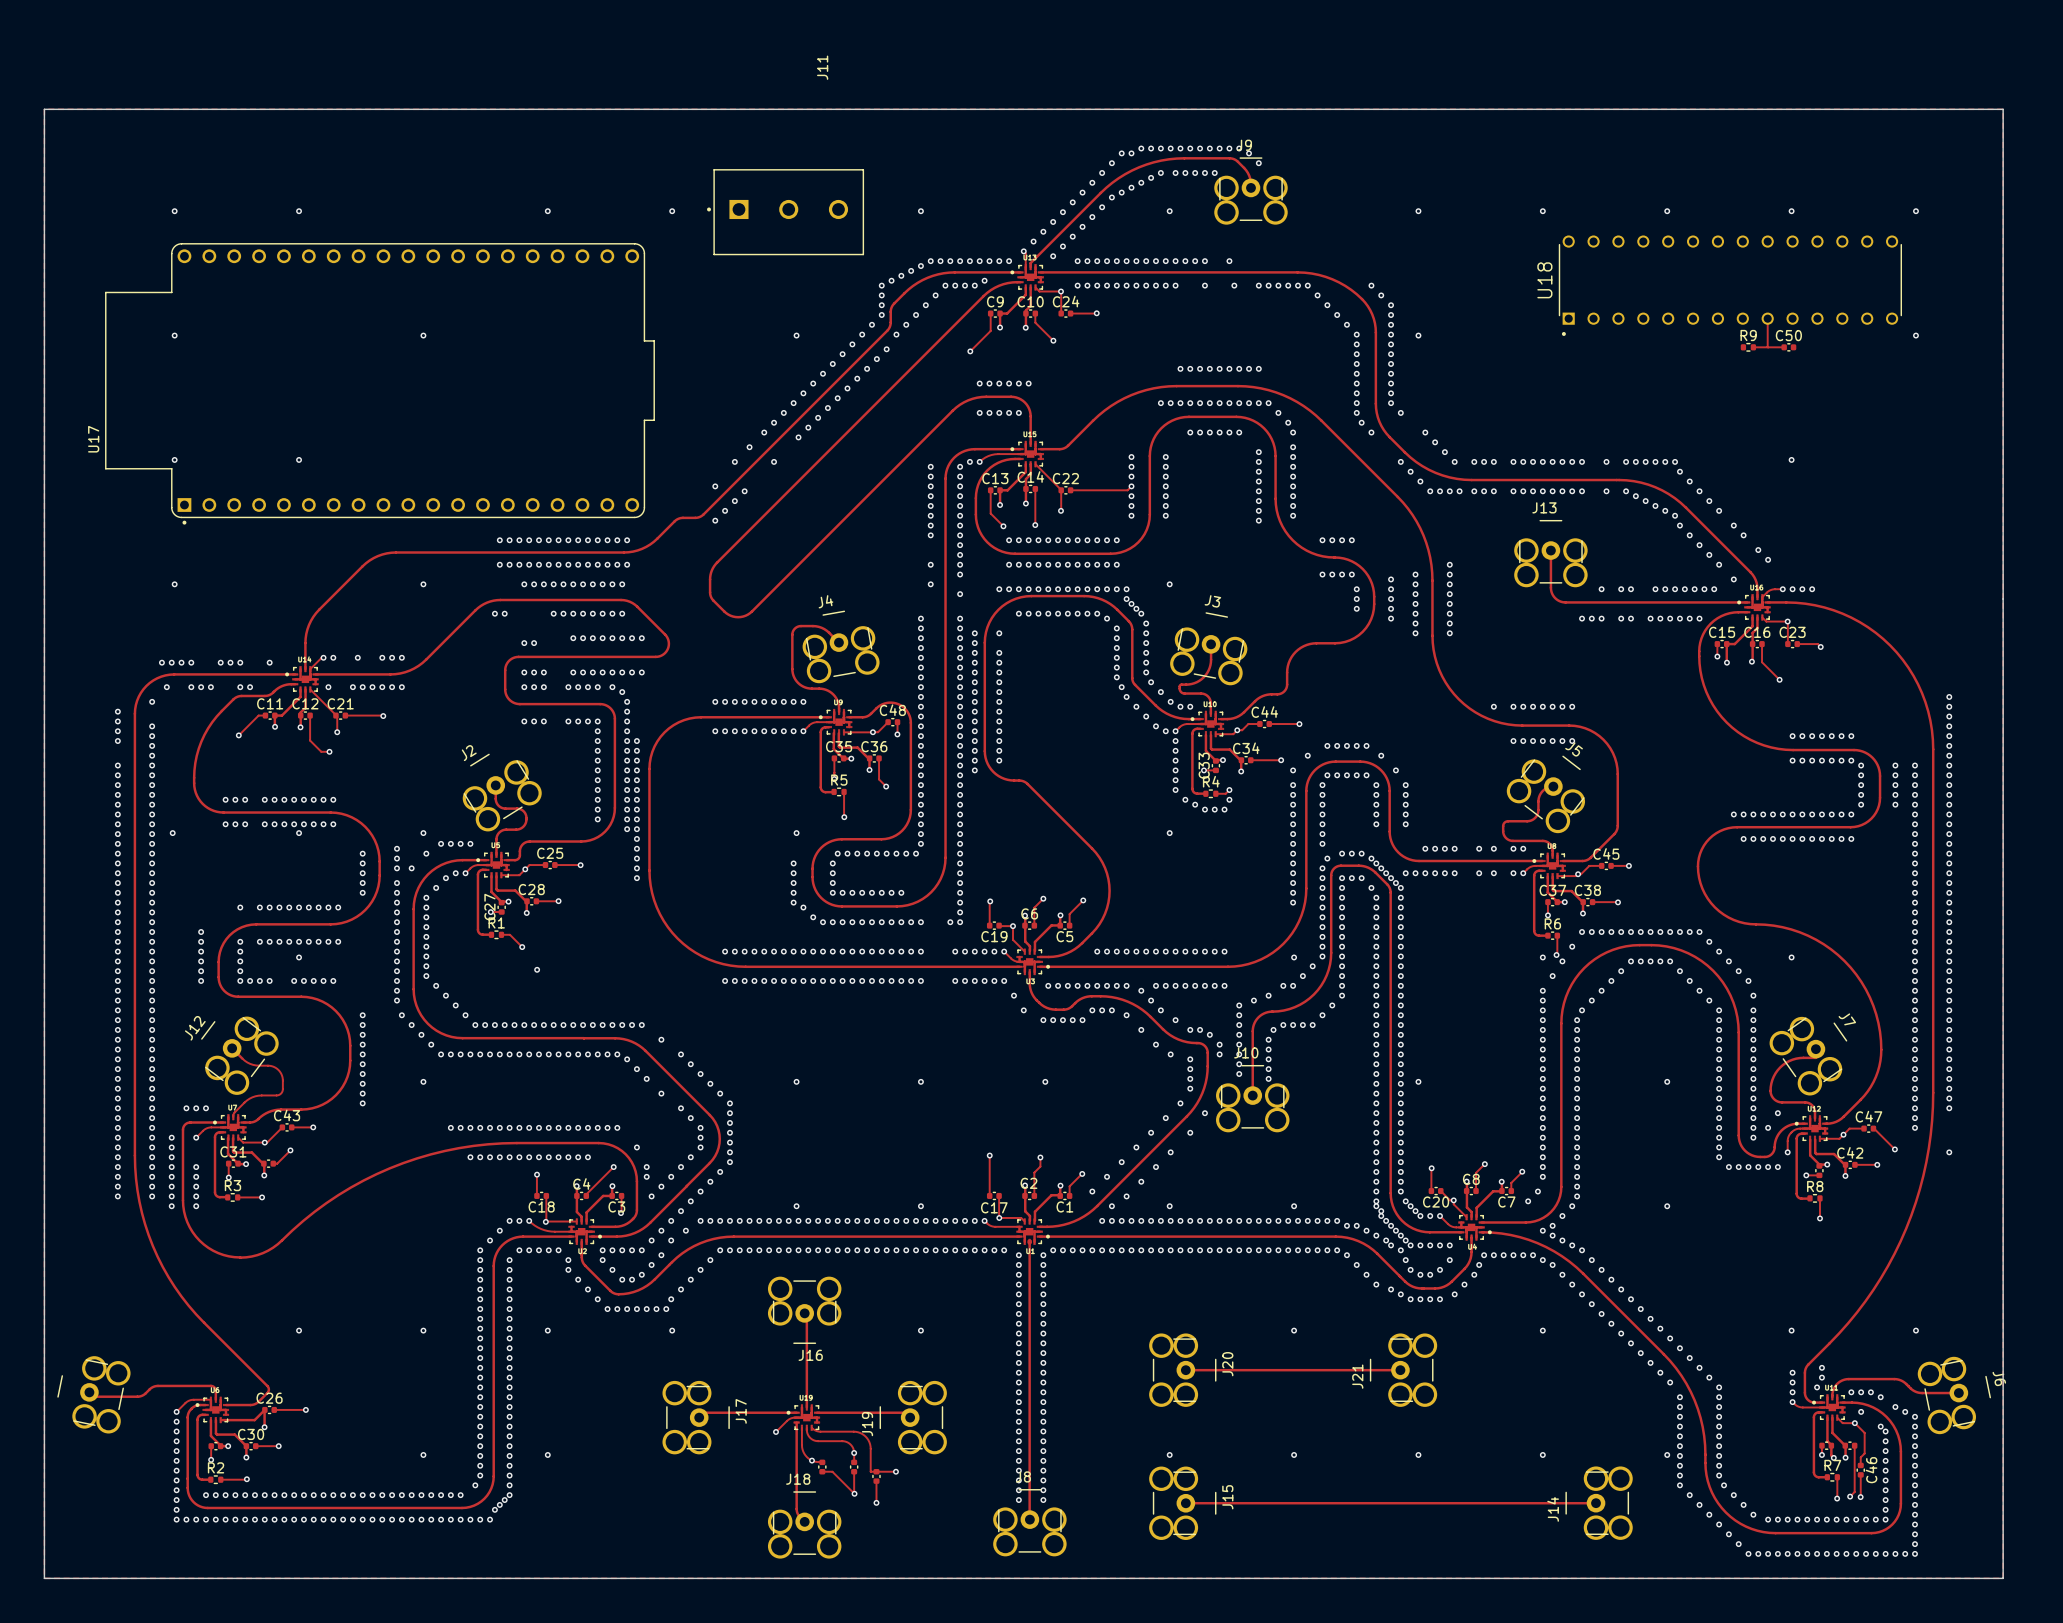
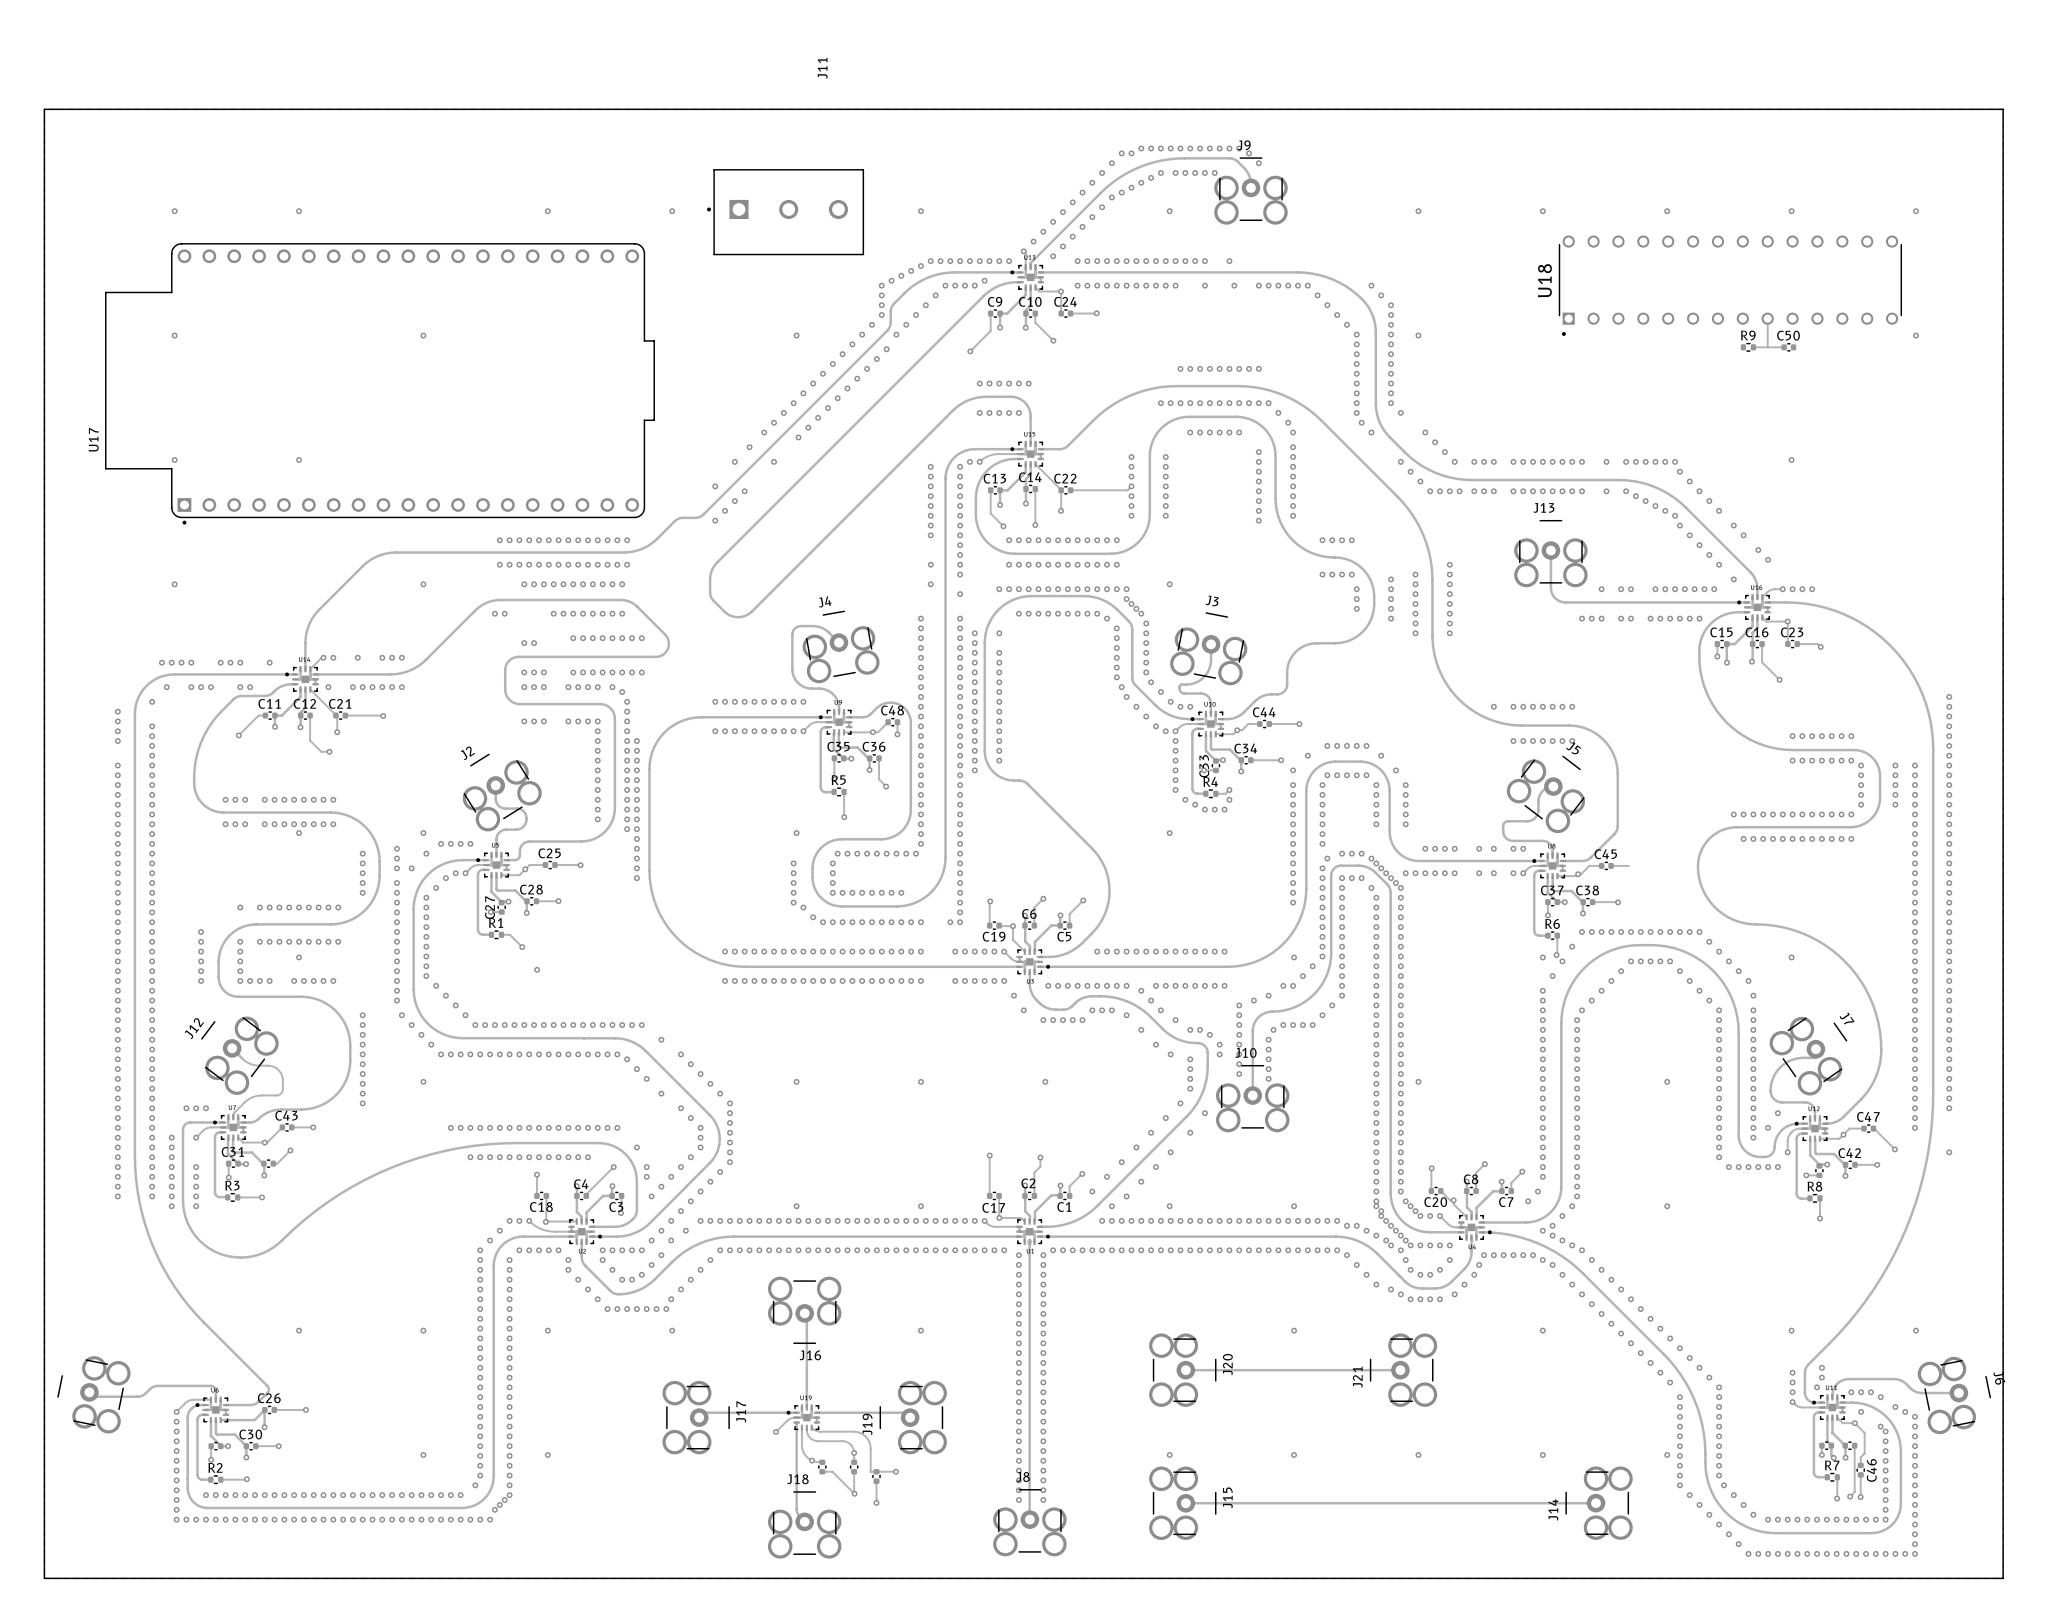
via: (172, 833) -> none
via: (1628, 865) -> none

